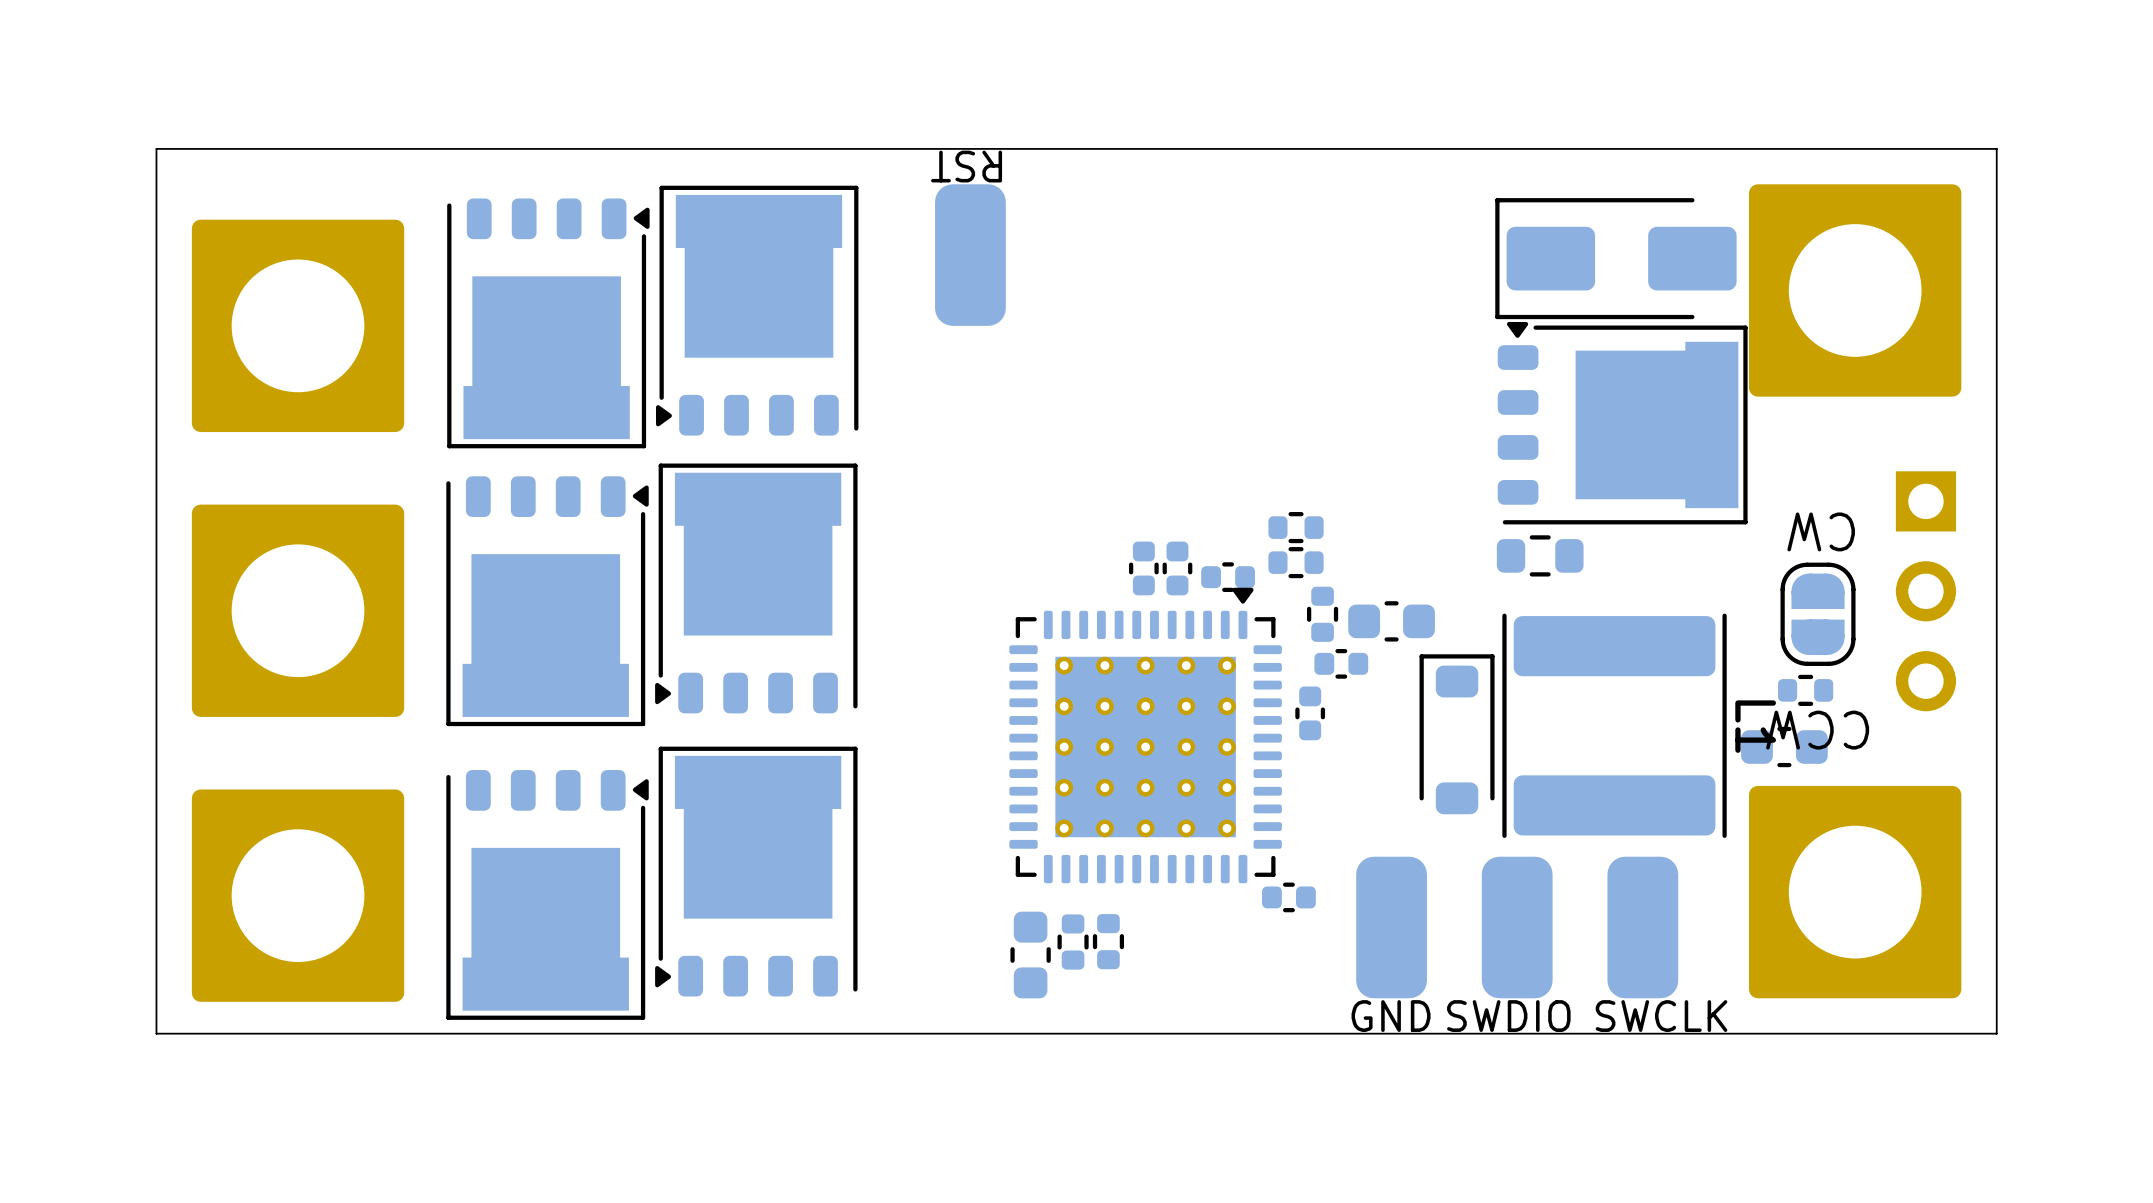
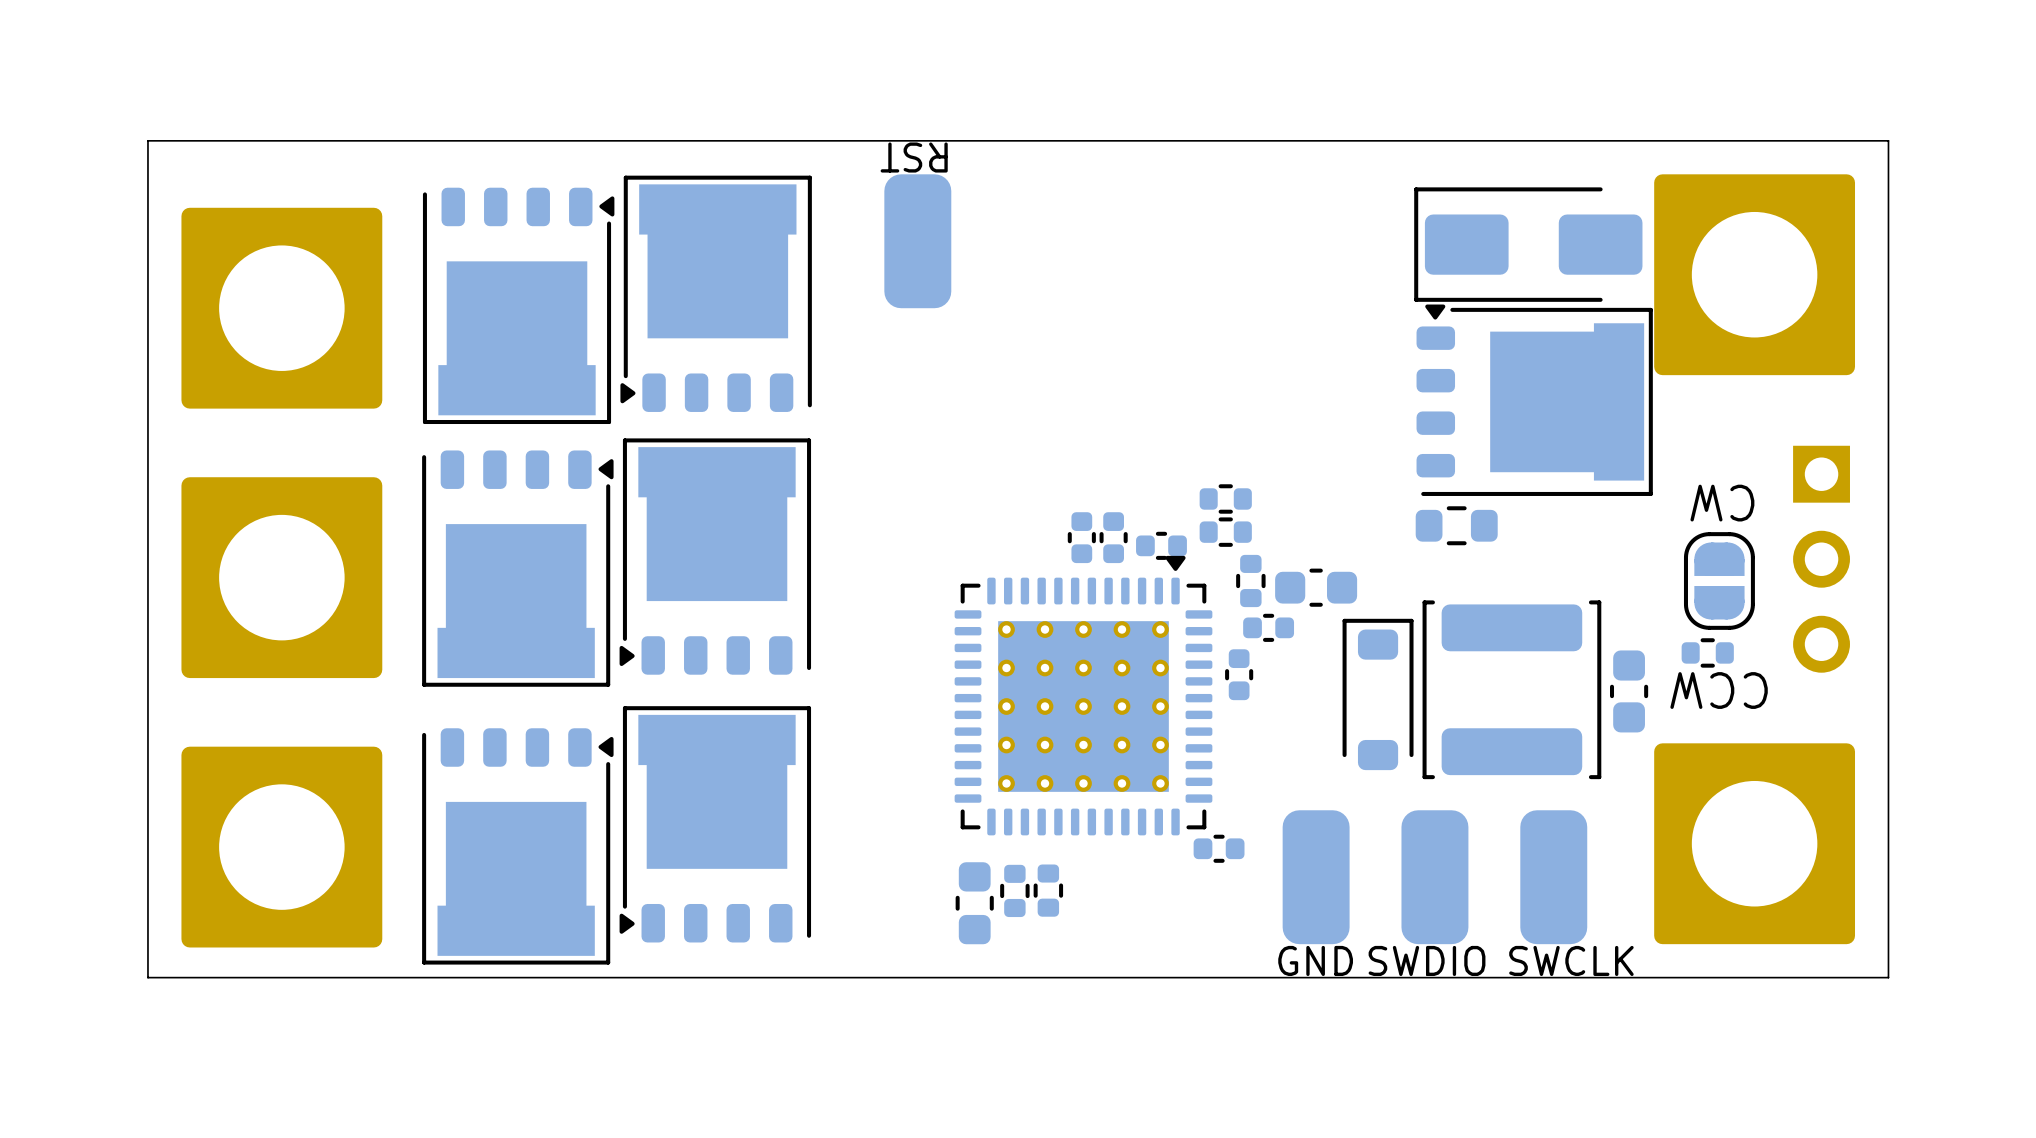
L1: (1614, 725) -> none
part: none -> (1511, 689)
part rotation: 0° (1784, 747) -> 90° clockwise (1629, 691)
part position: (1784, 747) -> (1629, 691)

